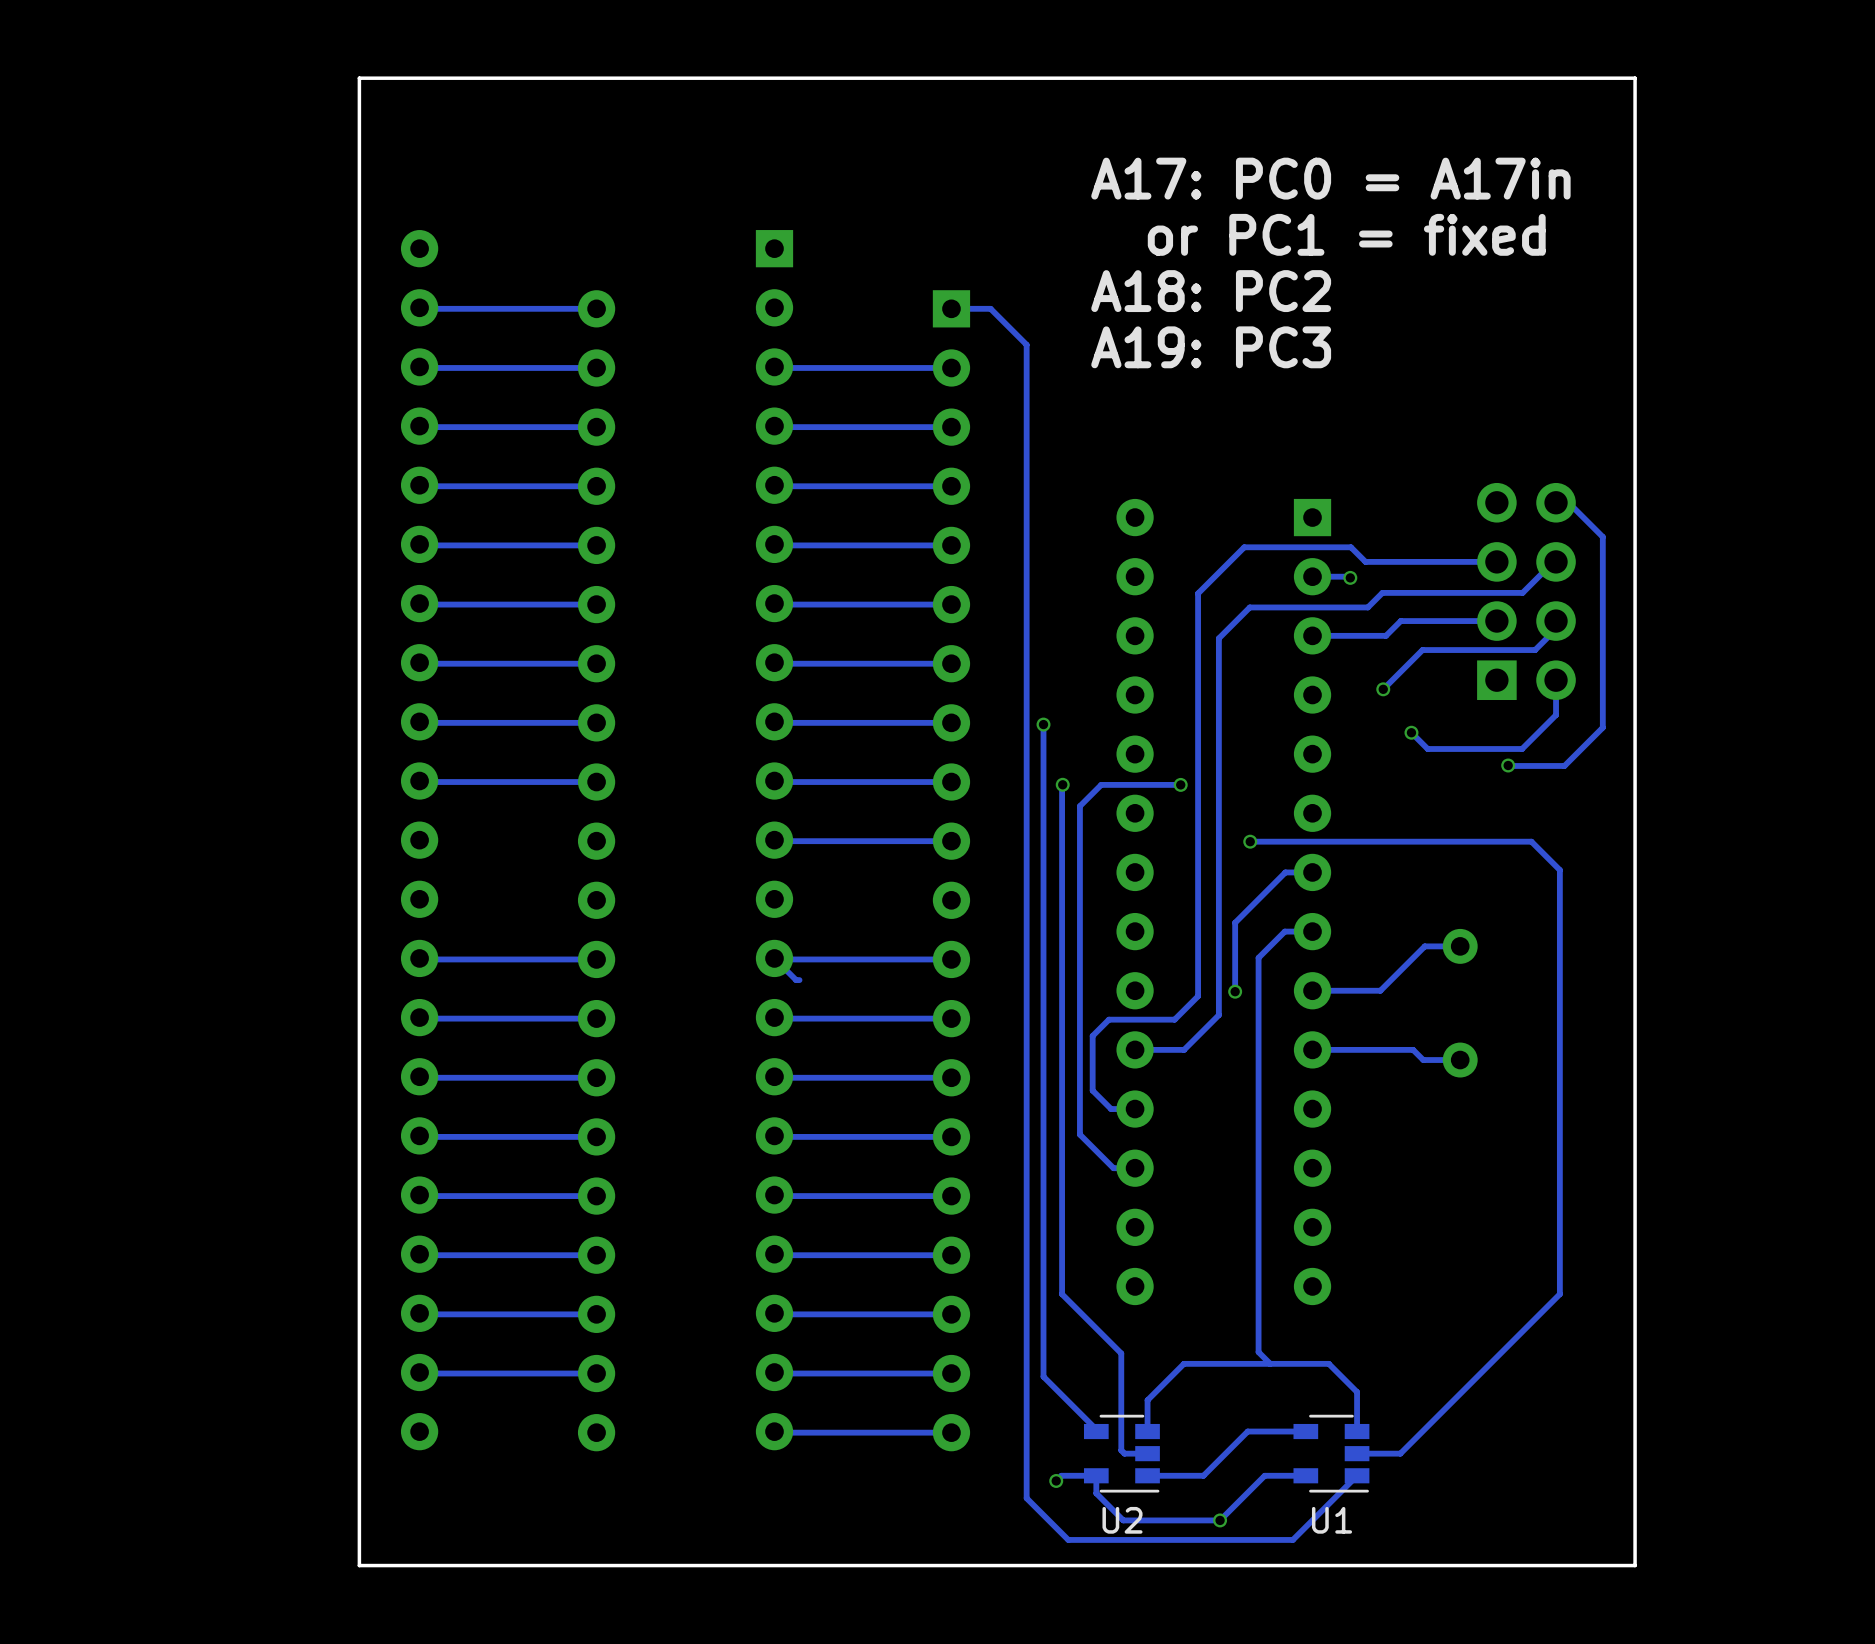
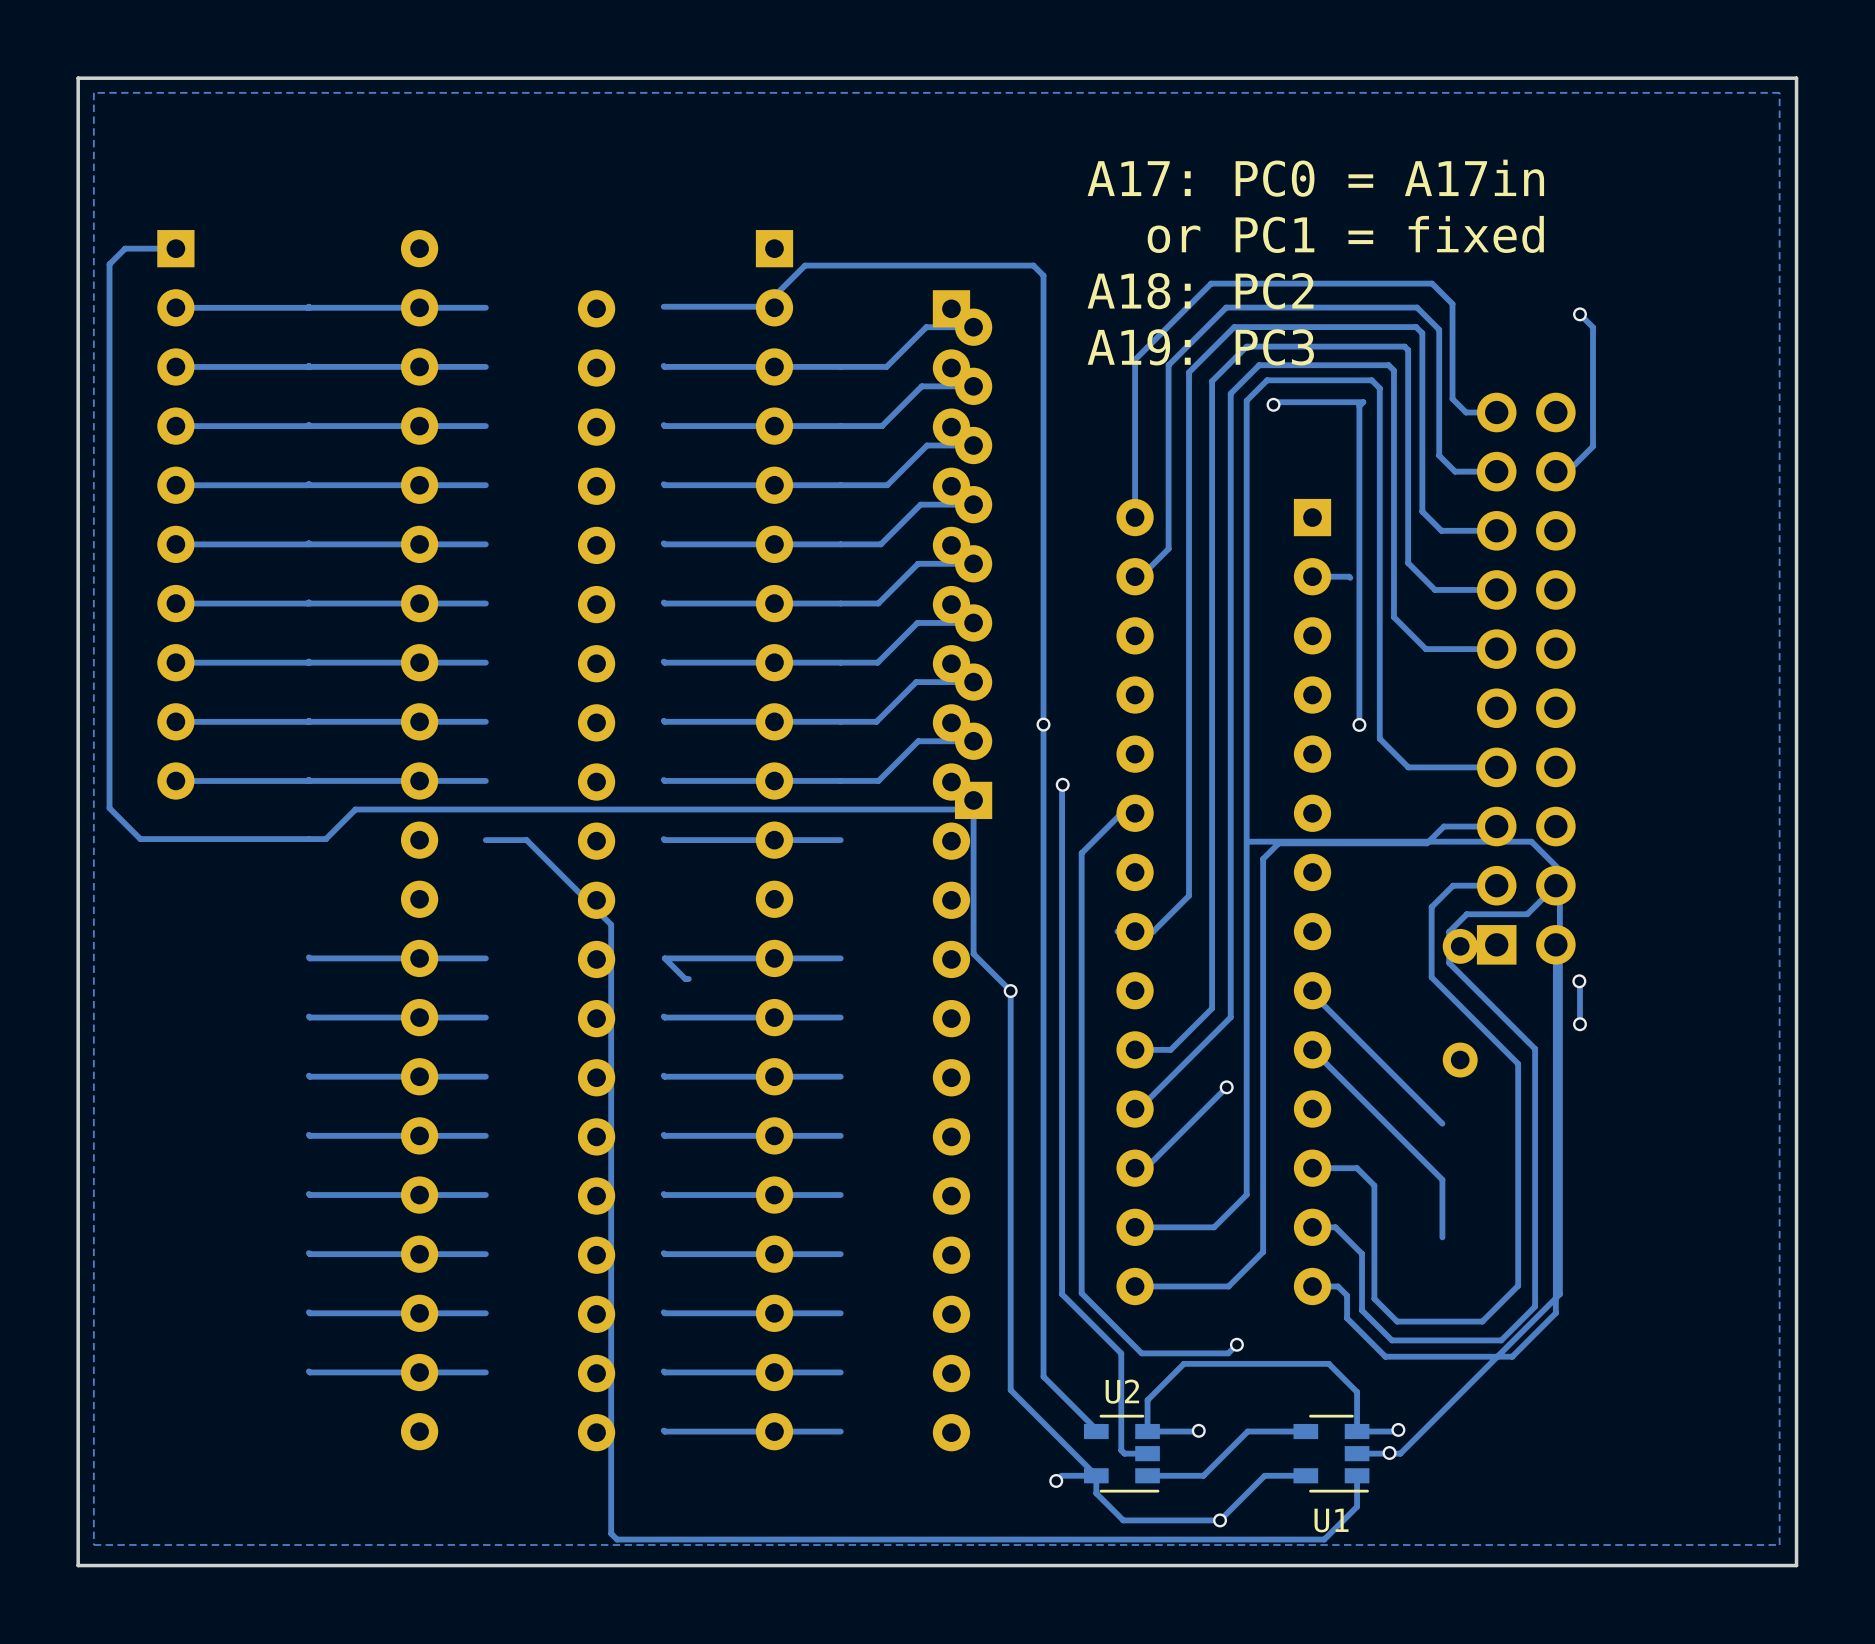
board edge: (359, 78) (359, 1565) -> (359, 78) (78, 78) (78, 1565) (359, 1565)
board edge: (1635, 78) (1635, 1565) -> (1635, 78) (1796, 78) (1796, 1565) (1635, 1565)
zone outline: none -> (1779, 92) (1779, 1544) (93, 1544) (93, 92) (1779, 92)
track: none -> (175, 248) (125, 248) (109, 264) (109, 808) (140, 839) (325, 839) (355, 809) (964, 809) (973, 800) (973, 953) (1010, 991) (1010, 1390) (1096, 1475)
track: none -> (663, 306) (763, 306) (805, 265) (1033, 265) (1043, 275) (1043, 724)
track: (419, 307) (596, 308) -> none
track: none -> (485, 307) (175, 307)
track: (951, 308) (990, 308) (1026, 344) (1026, 1498) (1068, 1539) (1292, 1539) (1357, 1475) -> (485, 840) (526, 840) (611, 924) (611, 1533) (617, 1539) (1324, 1539) (1357, 1506) (1357, 1475)
track: none -> (1579, 314) (1593, 327) (1593, 446) (1567, 471) (1555, 471)
via: none -> (1579, 314)
track: none -> (973, 327) (926, 327) (886, 366) (663, 365)
track: (419, 366) (596, 367) -> none
track: none -> (485, 366) (175, 366)
track: (774, 366) (951, 367) -> none
track: none -> (973, 386) (921, 386) (882, 426) (663, 425)
track: none -> (1273, 404) (1276, 402) (1363, 402) (1359, 406) (1359, 724)
via: none -> (1273, 404)
track: none -> (1496, 412) (1466, 412) (1452, 398) (1452, 304) (1432, 283) (1211, 283) (1135, 359) (1135, 517)
track: (419, 426) (596, 427) -> none
track: none -> (485, 426) (175, 426)
track: (774, 426) (951, 427) -> none
track: none -> (973, 445) (927, 445) (887, 485) (663, 484)
track: none -> (1496, 471) (1455, 471) (1439, 455) (1439, 329) (1417, 307) (1226, 307) (1168, 365) (1168, 548) (1140, 576) (1126, 576)
track: (419, 485) (596, 486) -> none
track: none -> (485, 485) (175, 485)
track: (774, 485) (951, 486) -> none
track: (1556, 502) (1568, 502) (1602, 536) (1602, 727) (1564, 765) (1508, 765) -> none
track: none -> (973, 504) (920, 504) (880, 544) (663, 543)
part: none -> (175, 514)
track: none -> (1496, 530) (1441, 530) (1422, 511) (1422, 333) (1416, 327) (1234, 327) (1189, 372) (1189, 895) (1153, 931) (1117, 931)
track: (419, 544) (596, 545) -> none
track: none -> (485, 544) (175, 544)
track: (774, 544) (951, 545) -> none
track: (1496, 561) (1365, 561) (1350, 547) (1244, 547) (1198, 593) (1198, 996) (1174, 1019) (1108, 1019) (1092, 1035) (1092, 1090) (1111, 1109) (1135, 1109) -> (1496, 649) (1425, 649) (1393, 617) (1393, 370) (1388, 365) (1259, 365) (1230, 393) (1230, 1017) (1139, 1109) (1135, 1109)
track: (1556, 561) (1553, 561) (1522, 592) (1382, 592) (1367, 607) (1249, 607) (1218, 638) (1218, 1015) (1184, 1049) (1170, 1049) -> (1496, 589) (1435, 589) (1408, 563) (1408, 350) (1404, 346) (1246, 346) (1212, 381) (1212, 1008) (1170, 1049)
track: none -> (973, 563) (918, 563) (878, 603) (663, 602)
part: none -> (973, 563)
via: (1350, 577) -> none
part: (1526, 591) -> none
track: (419, 603) (596, 604) -> none
track: none -> (485, 603) (175, 603)
track: (774, 603) (951, 604) -> none
track: (1496, 621) (1400, 621) (1385, 635) (1312, 635) -> none
track: (1556, 621) (1556, 629) (1535, 650) (1422, 650) (1383, 689) -> none
track: none -> (973, 622) (917, 622) (877, 662) (663, 661)
track: (419, 662) (596, 663) -> none
track: none -> (485, 662) (175, 662)
track: (774, 662) (951, 663) -> none
part: none -> (1526, 678)
track: (1556, 680) (1556, 715) (1522, 749) (1427, 749) (1411, 732) -> none
track: none -> (973, 682) (916, 682) (876, 721) (663, 720)
via: (1383, 689) -> none
track: (419, 721) (596, 722) -> none
track: none -> (485, 721) (175, 721)
track: (774, 721) (951, 722) -> none
via: none -> (1359, 724)
via: (1411, 732) -> none
track: none -> (973, 741) (918, 741) (878, 780) (663, 779)
via: (1508, 765) -> none
track: none -> (1496, 767) (1408, 767) (1379, 738) (1379, 388) (1371, 380) (1267, 380) (1246, 400) (1246, 1194) (1214, 1227) (1135, 1227)
track: none -> (485, 780) (175, 781)
track: (419, 781) (596, 782) -> none
track: (774, 781) (951, 782) -> none
track: (1180, 784) (1101, 784) (1079, 806) (1079, 1134) (1113, 1168) (1135, 1168) -> (1226, 1087) (1145, 1168) (1135, 1168)
via: (1180, 784) -> none
track: none -> (1135, 813) (1121, 813) (1081, 853) (1081, 1293) (1141, 1353) (1228, 1353) (1236, 1344)
track: none -> (1496, 826) (1443, 826) (1427, 843) (1278, 843) (1263, 858) (1263, 1251) (1228, 1286) (1135, 1286)
track: (774, 840) (951, 841) -> (663, 839) (840, 840)
via: (1250, 841) -> none
track: (1312, 872) (1285, 872) (1235, 922) (1235, 991) -> none
track: none -> (1496, 885) (1453, 885) (1431, 907) (1431, 977) (1518, 1063) (1518, 1285) (1482, 1321) (1397, 1321) (1374, 1298) (1374, 1185) (1357, 1168) (1312, 1168)
track: none -> (1555, 885) (1527, 914) (1466, 914) (1449, 931) (1449, 963) (1535, 1048) (1535, 1306) (1501, 1340) (1391, 1340) (1362, 1310) (1362, 1253) (1335, 1227) (1312, 1227)
track: (1312, 931) (1284, 931) (1258, 957) (1258, 1352) (1270, 1363) -> none
track: none -> (1555, 944) (1555, 1313) (1512, 1356) (1385, 1356) (1347, 1318) (1347, 1295) (1338, 1286) (1312, 1286)
track: (1460, 946) (1424, 946) (1380, 990) (1312, 990) -> (1442, 1123) (1312, 993) (1312, 990)
track: (419, 958) (596, 959) -> (308, 957) (485, 958)
track: (951, 959) (775, 959) (796, 980) (799, 980) -> (840, 958) (664, 958) (685, 979) (688, 979)
track: none -> (1579, 981) (1579, 1024)
via: none -> (1579, 981)
via: none -> (1010, 991)
via position: (1235, 991) -> (1226, 1087)
track: (419, 1017) (596, 1018) -> (308, 1016) (485, 1017)
track: (774, 1017) (951, 1018) -> (663, 1016) (840, 1017)
via: none -> (1579, 1024)
track: (1312, 1049) (1413, 1049) (1423, 1060) (1460, 1060) -> (1312, 1049) (1442, 1179) (1442, 1237)
track: (419, 1076) (596, 1077) -> (308, 1075) (485, 1076)
track: (774, 1076) (951, 1077) -> (663, 1075) (840, 1076)
track: (419, 1135) (596, 1136) -> (308, 1134) (485, 1135)
track: (774, 1135) (951, 1136) -> (663, 1134) (840, 1135)
track: (419, 1195) (596, 1196) -> (308, 1193) (485, 1195)
track: (774, 1195) (951, 1196) -> (663, 1193) (840, 1195)
track: (419, 1254) (596, 1255) -> (308, 1253) (485, 1254)
track: (774, 1254) (951, 1255) -> (663, 1253) (840, 1254)
track: (419, 1313) (596, 1314) -> (308, 1312) (485, 1313)
track: (774, 1313) (951, 1314) -> (663, 1312) (840, 1313)
via: none -> (1236, 1344)
track: (419, 1372) (596, 1373) -> (308, 1371) (485, 1372)
track: (774, 1372) (951, 1373) -> (663, 1371) (840, 1372)
track: none -> (1398, 1429) (1396, 1431) (1357, 1431)
via: none -> (1398, 1429)
track: none -> (1198, 1430) (1147, 1431)
via: none -> (1198, 1430)
track: (774, 1431) (951, 1432) -> (663, 1430) (840, 1431)
via: none -> (1389, 1453)
U2 name position: U2 (1122, 1520) -> U2 (1122, 1391)

